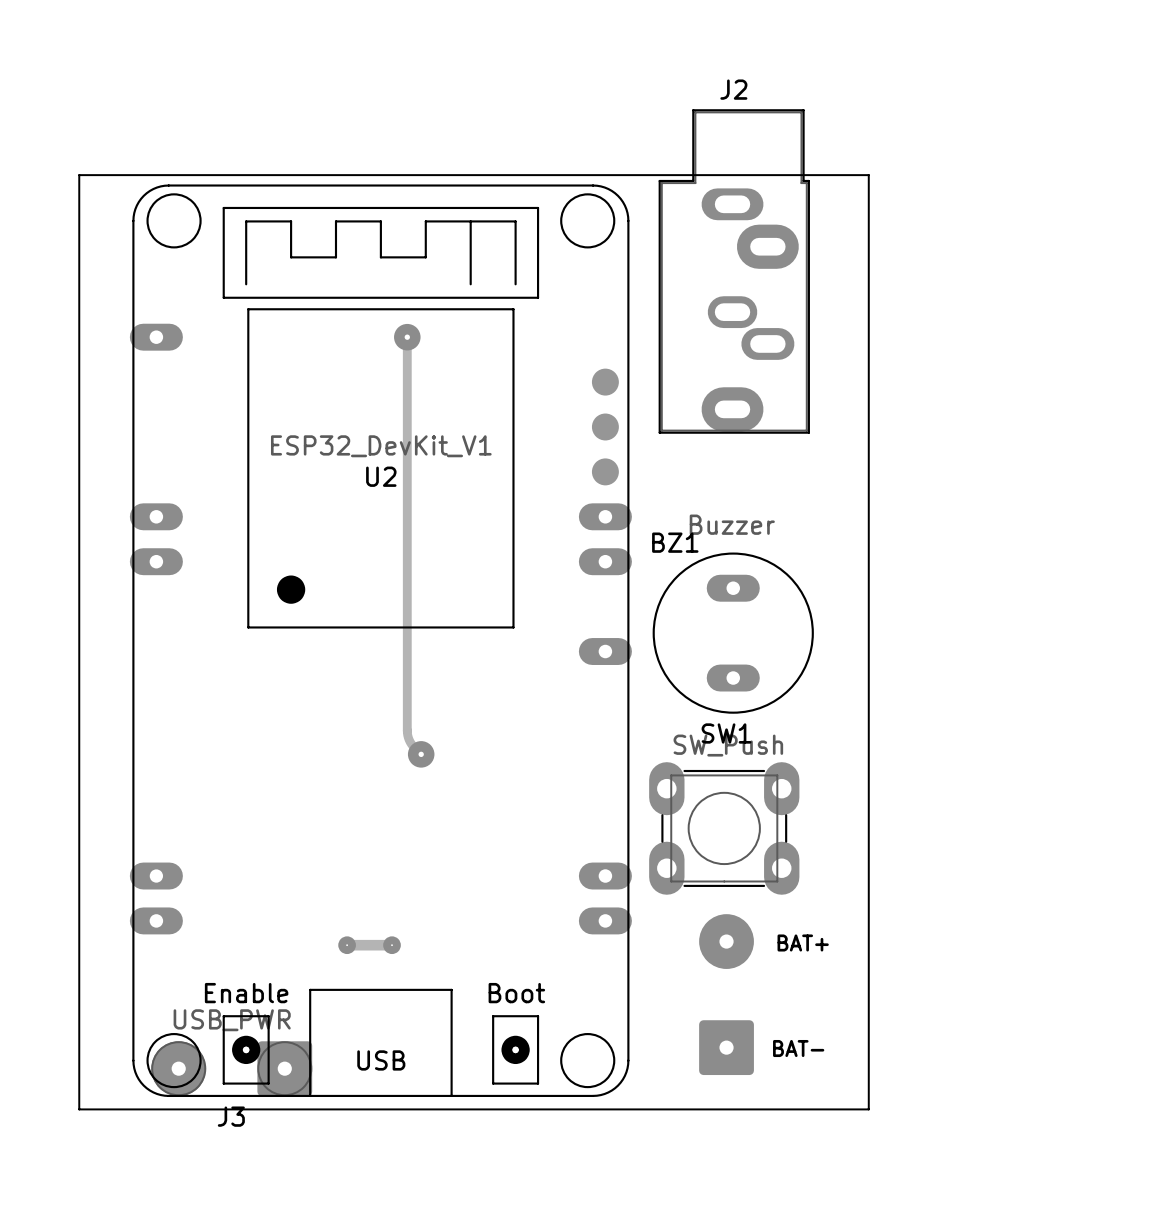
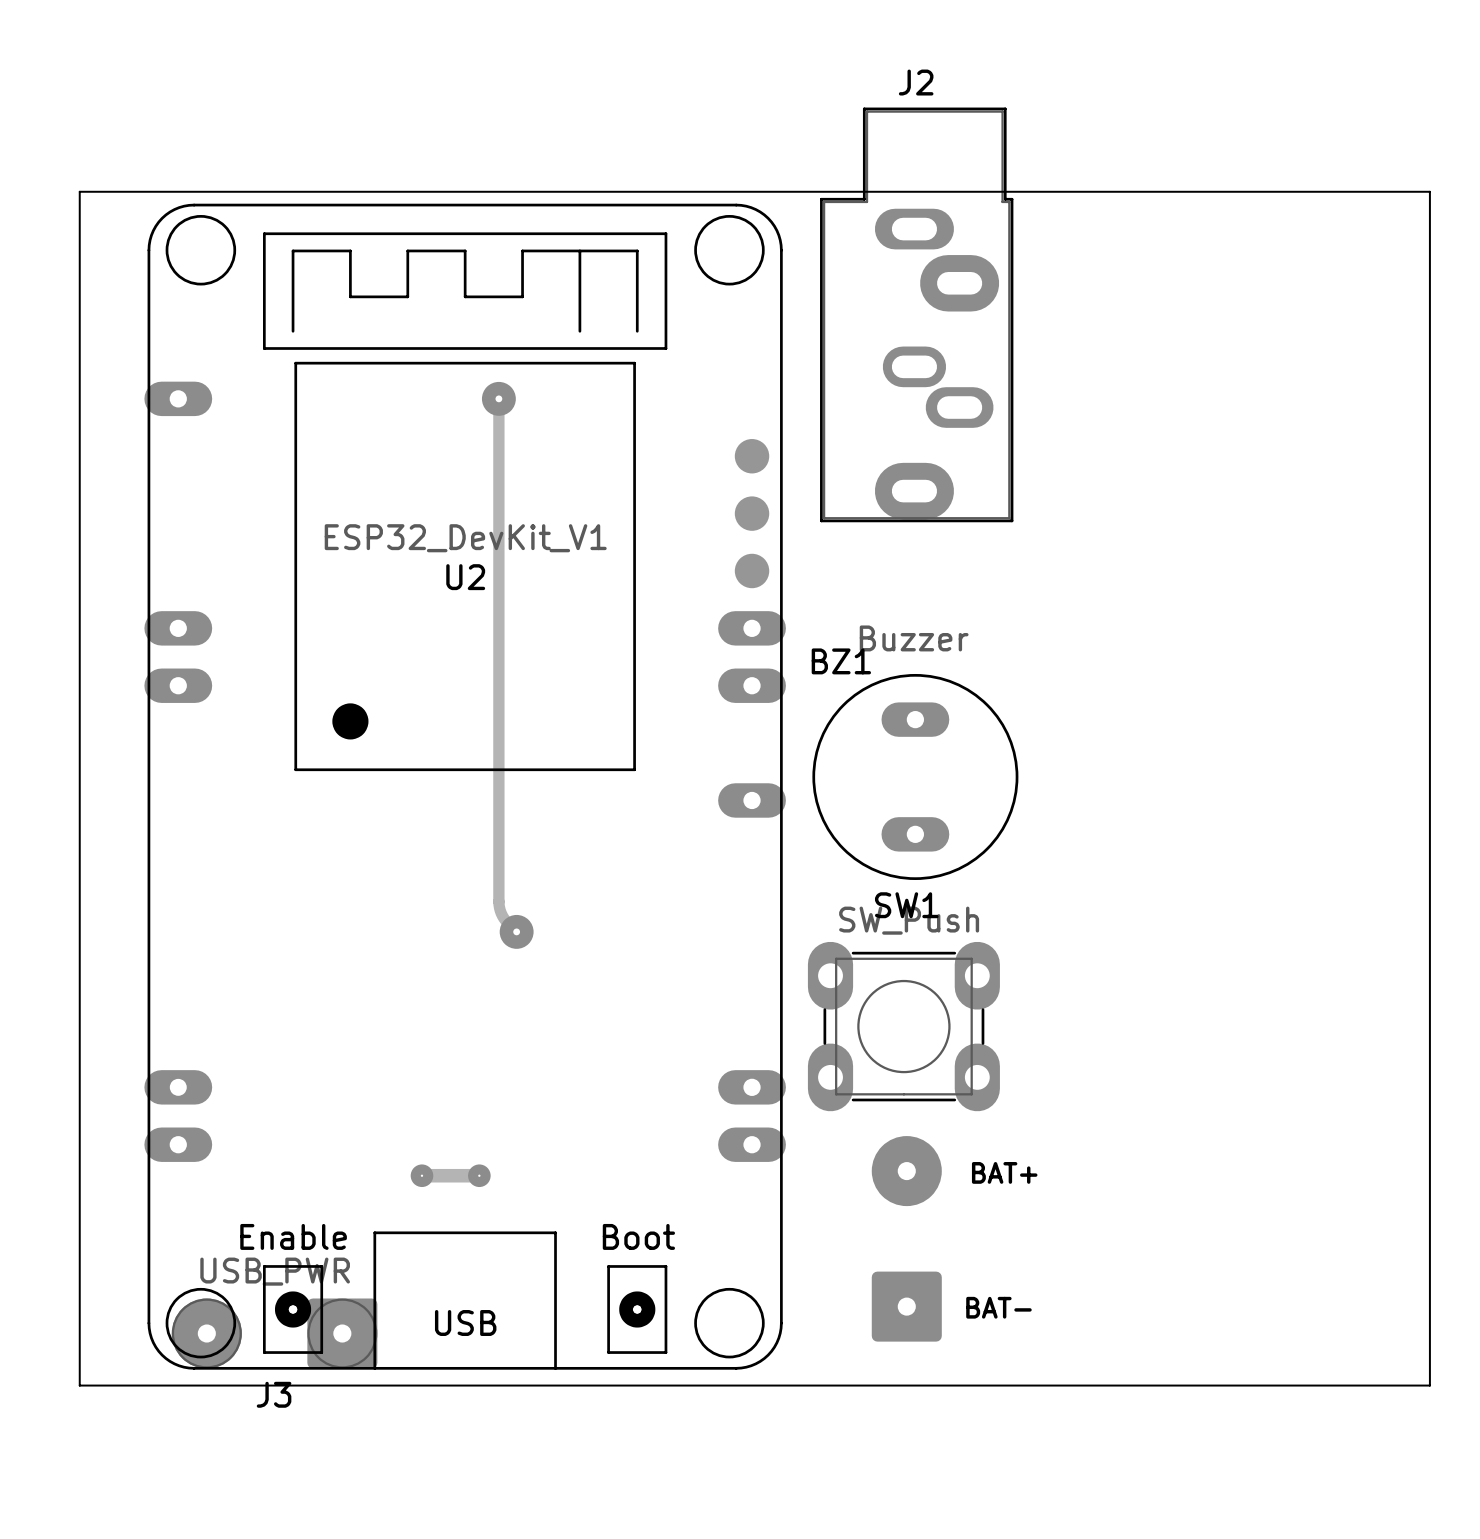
board edge: (868, 175) (868, 1109) -> (1088, 191) (1429, 191) (1429, 1385) (1088, 1385)

